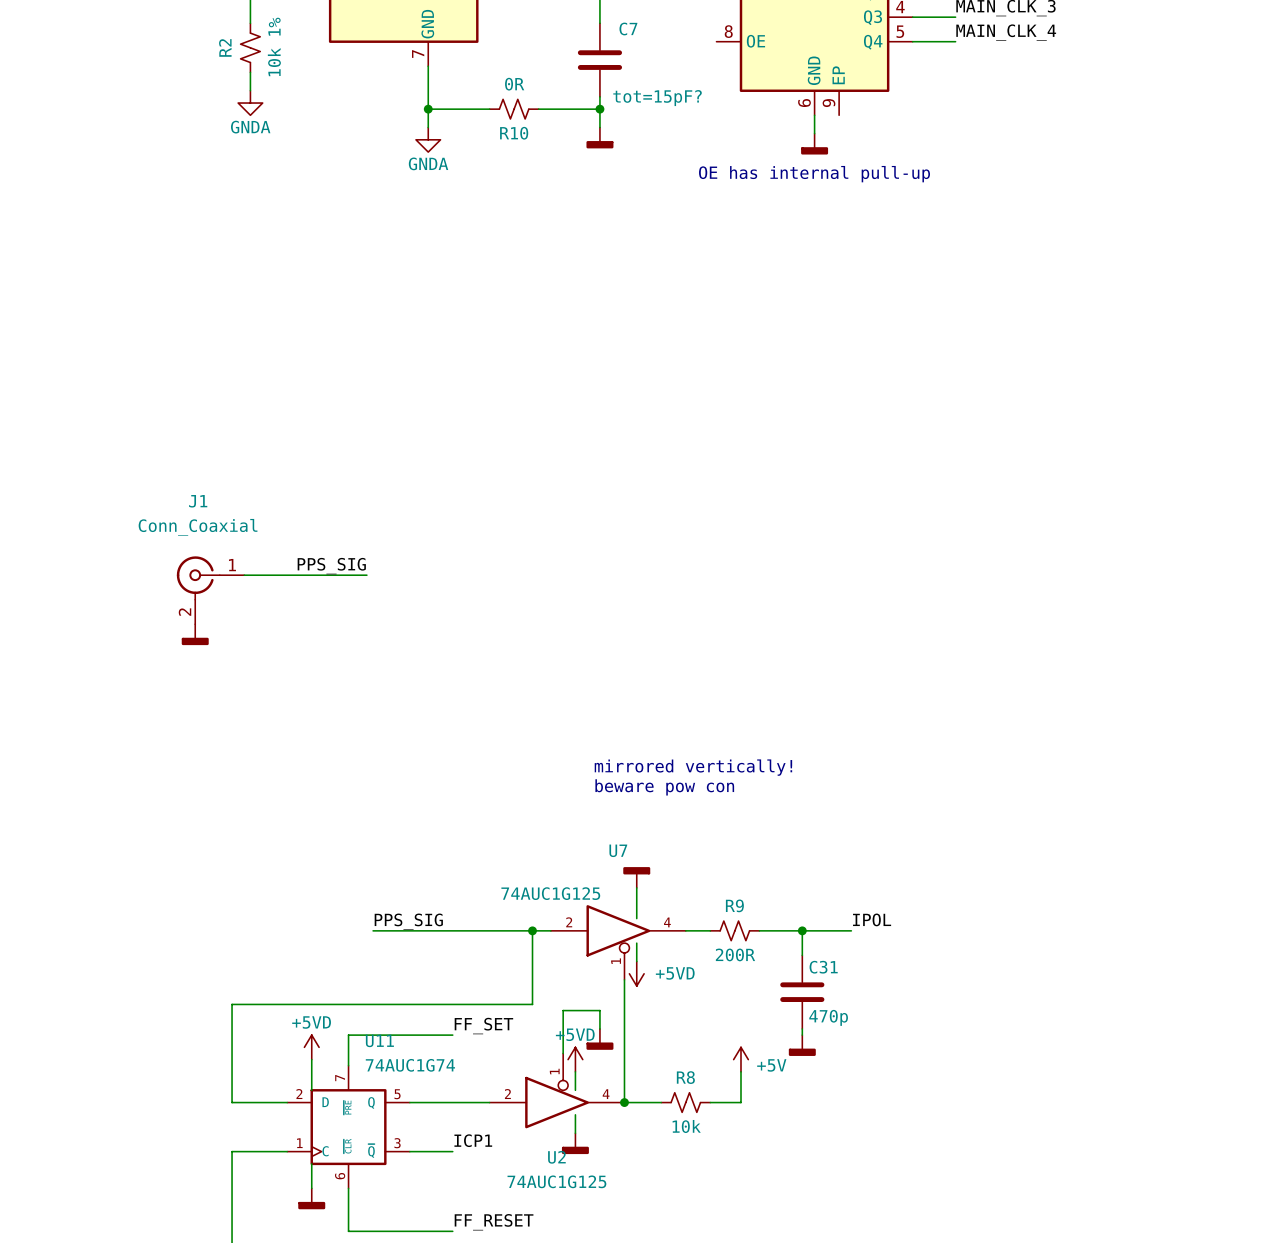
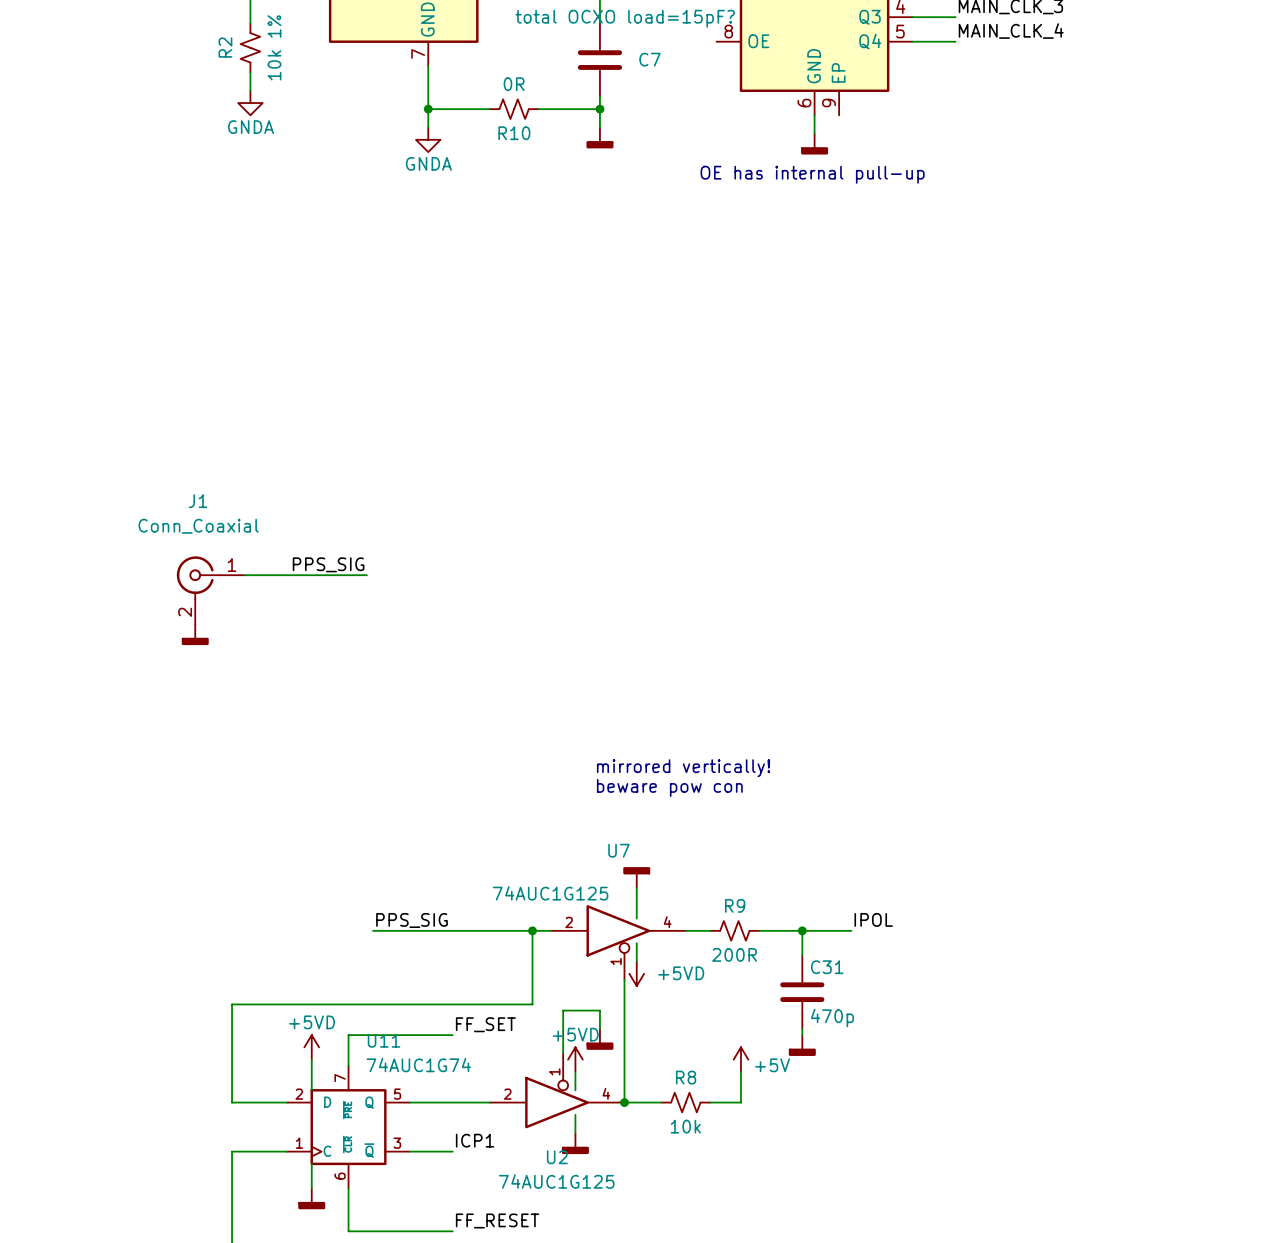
C7 name position: C7 (628, 28) -> C7 (649, 59)
C7 value: tot=15pF? (657, 98) -> total OCXO load=15pF? (625, 18)

